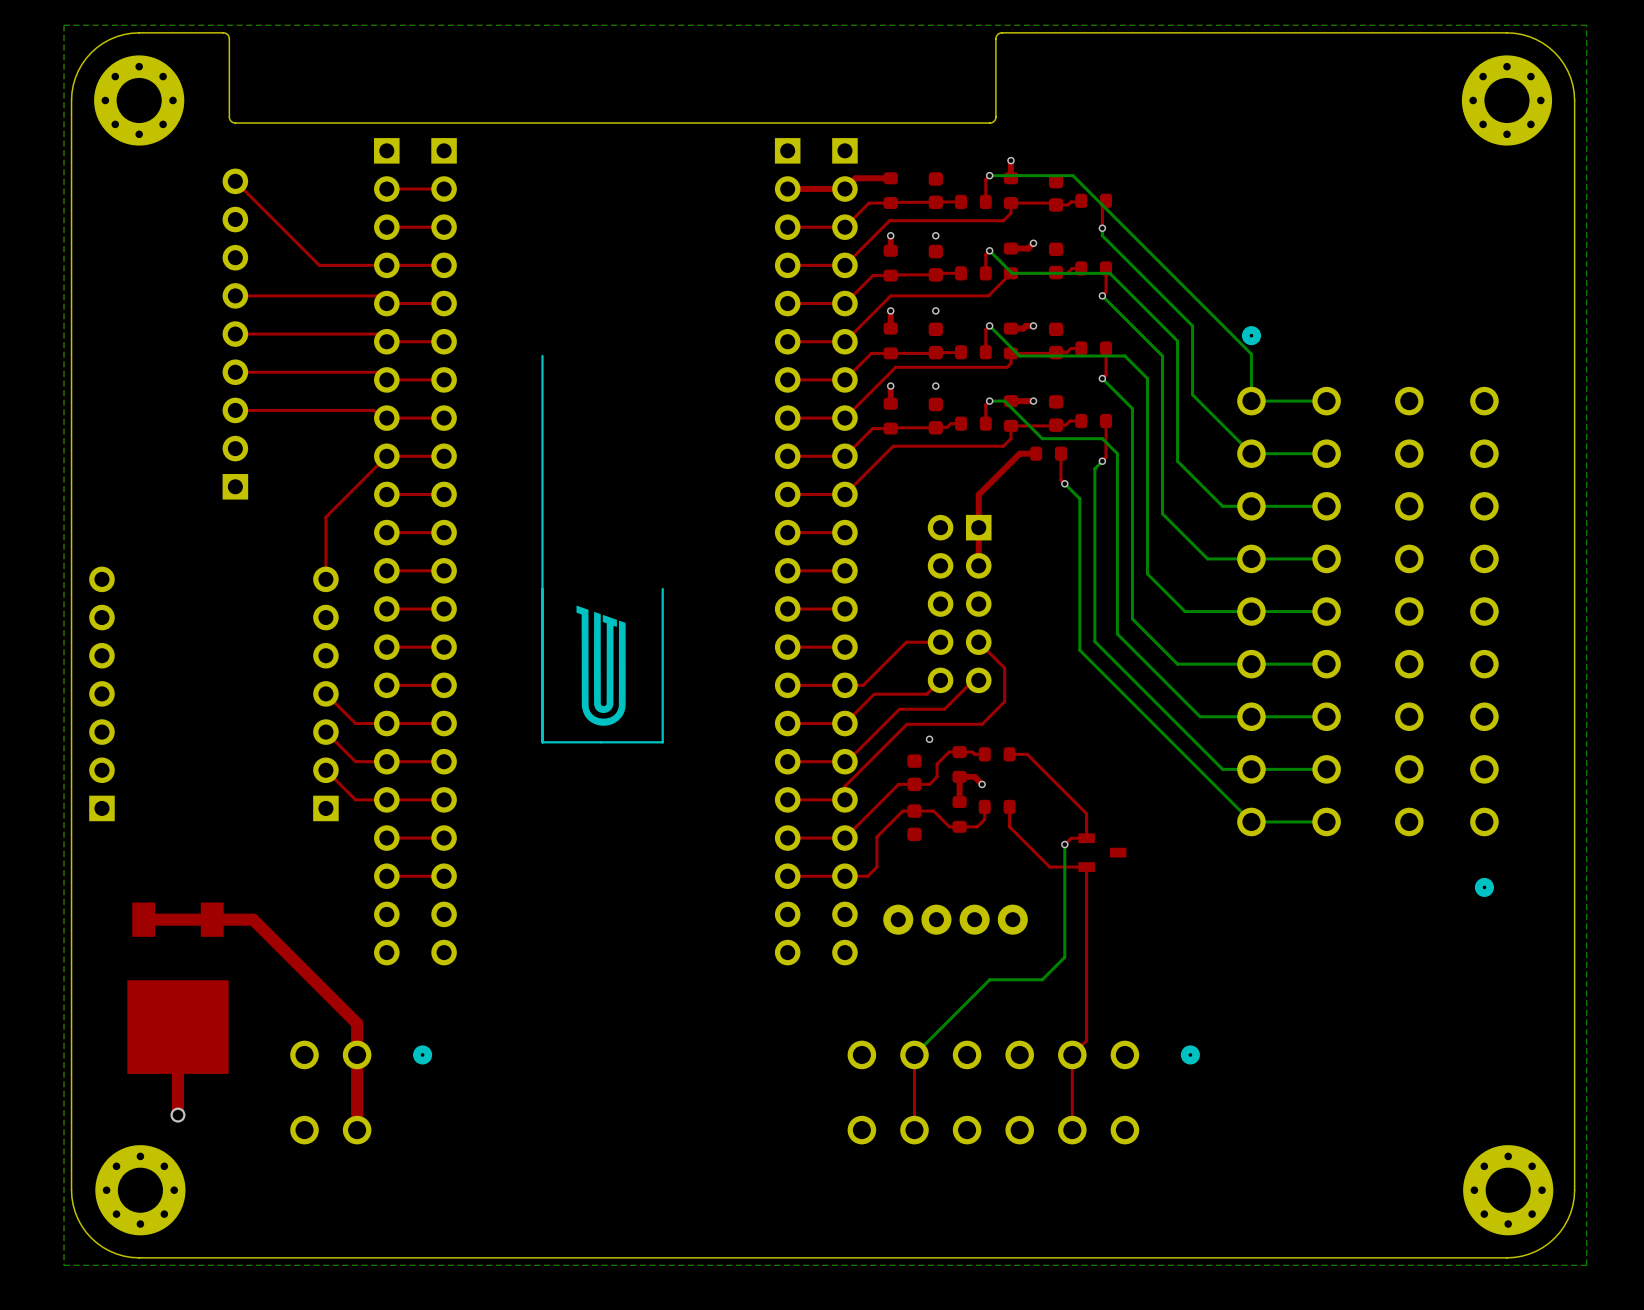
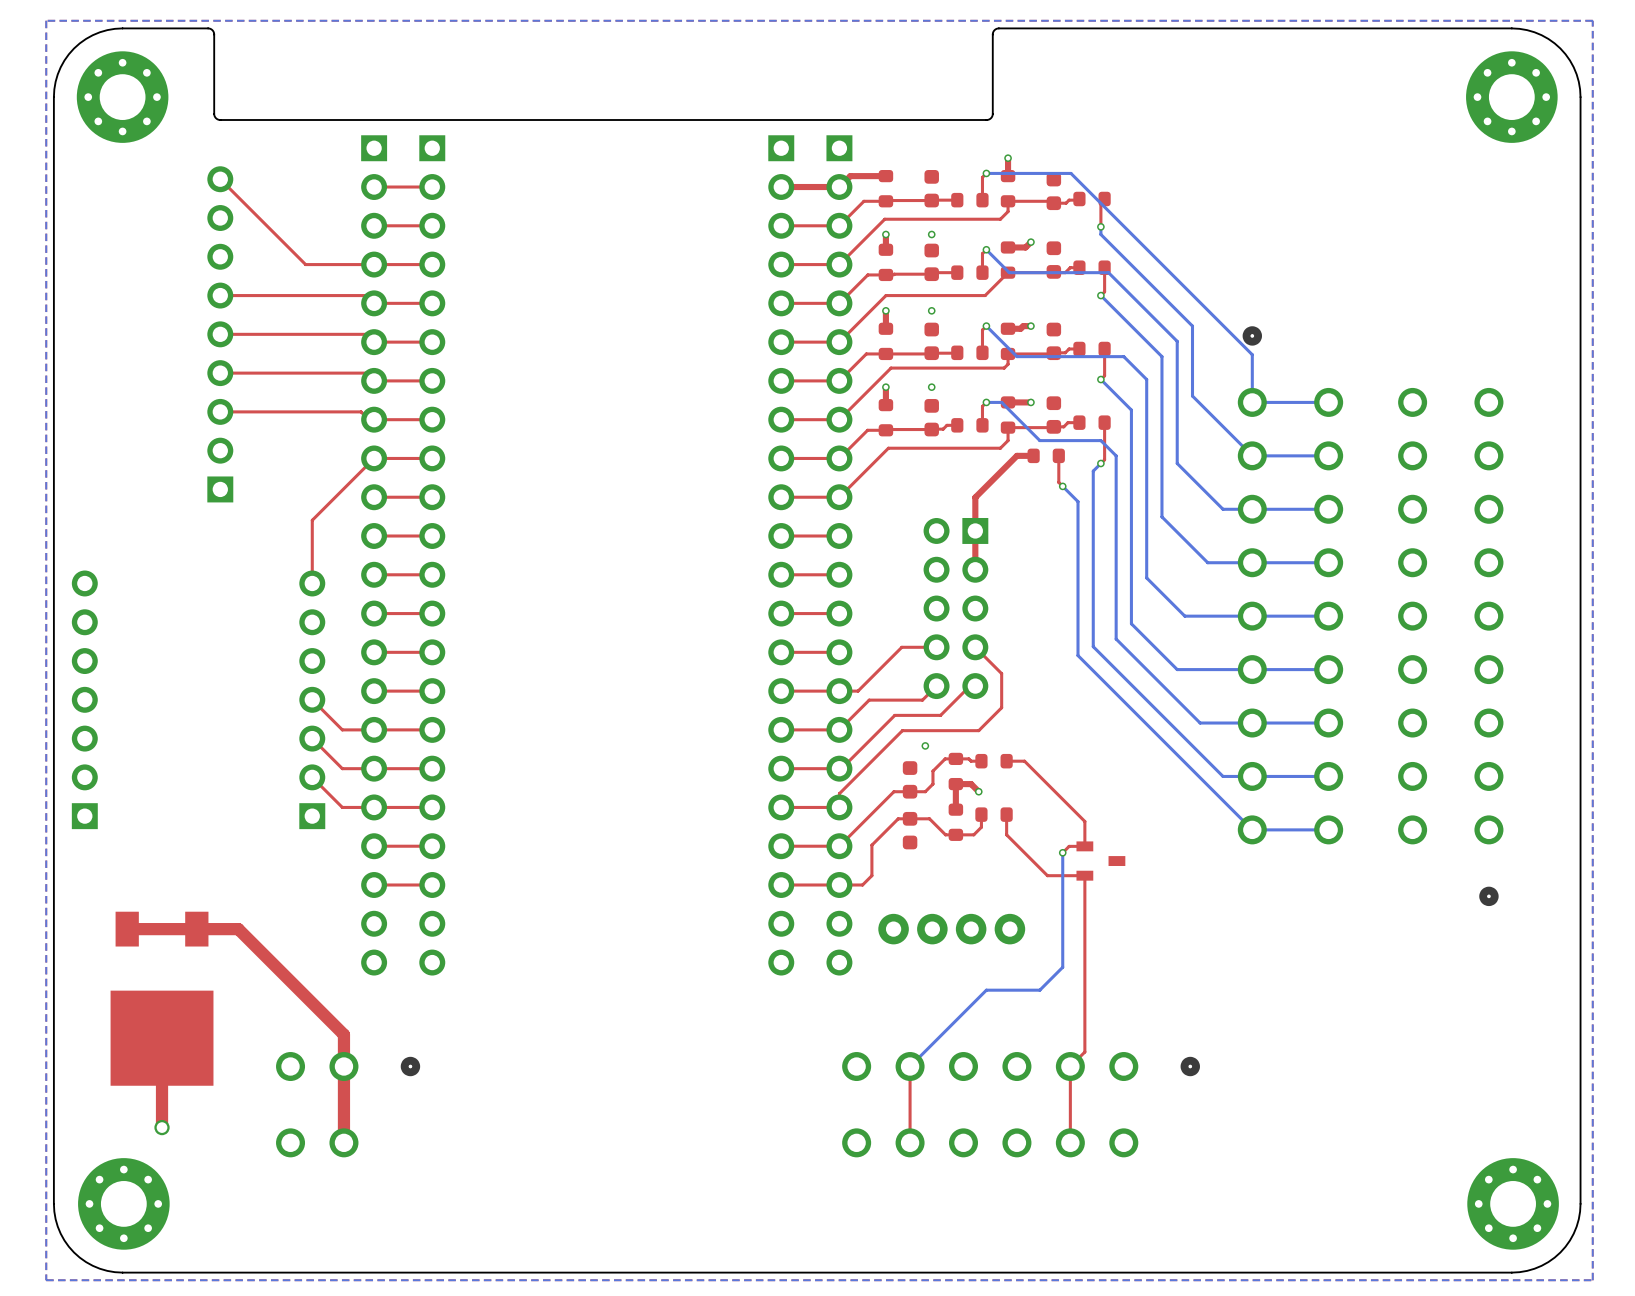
line: (542, 356) (542, 742) (662, 742) (662, 588) -> none
drawing: [576, 605, 626, 726] -> none

